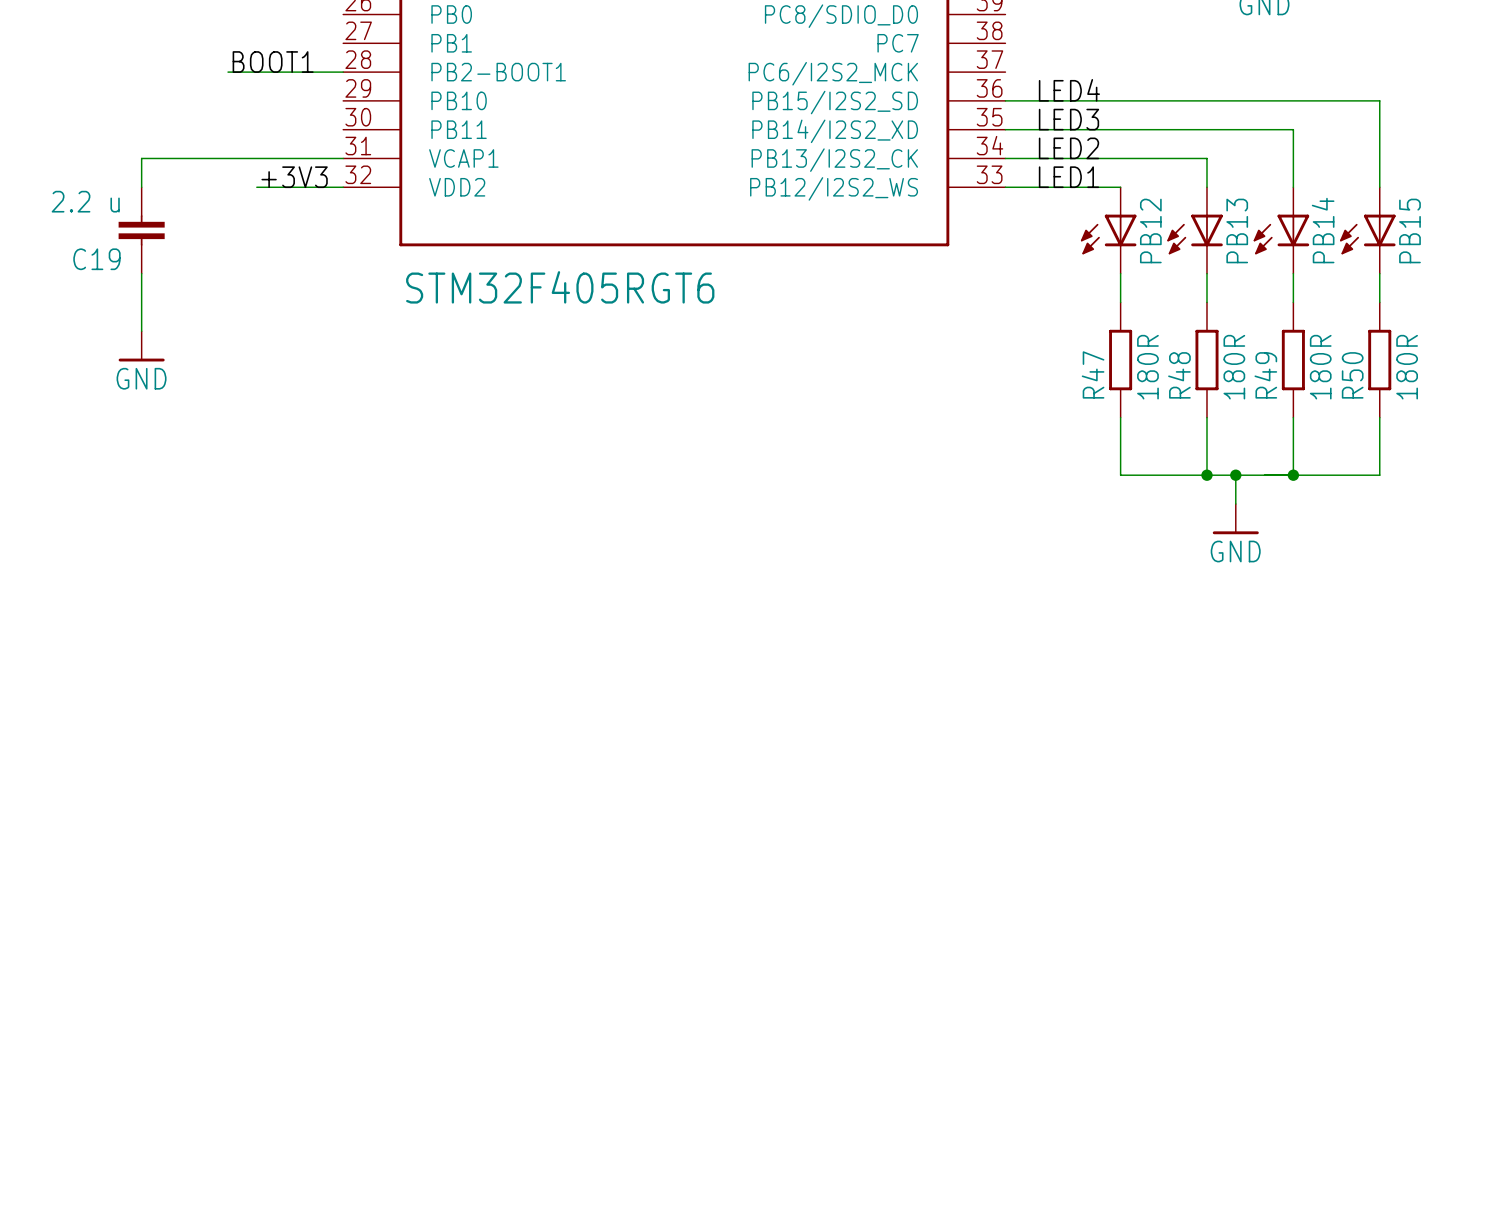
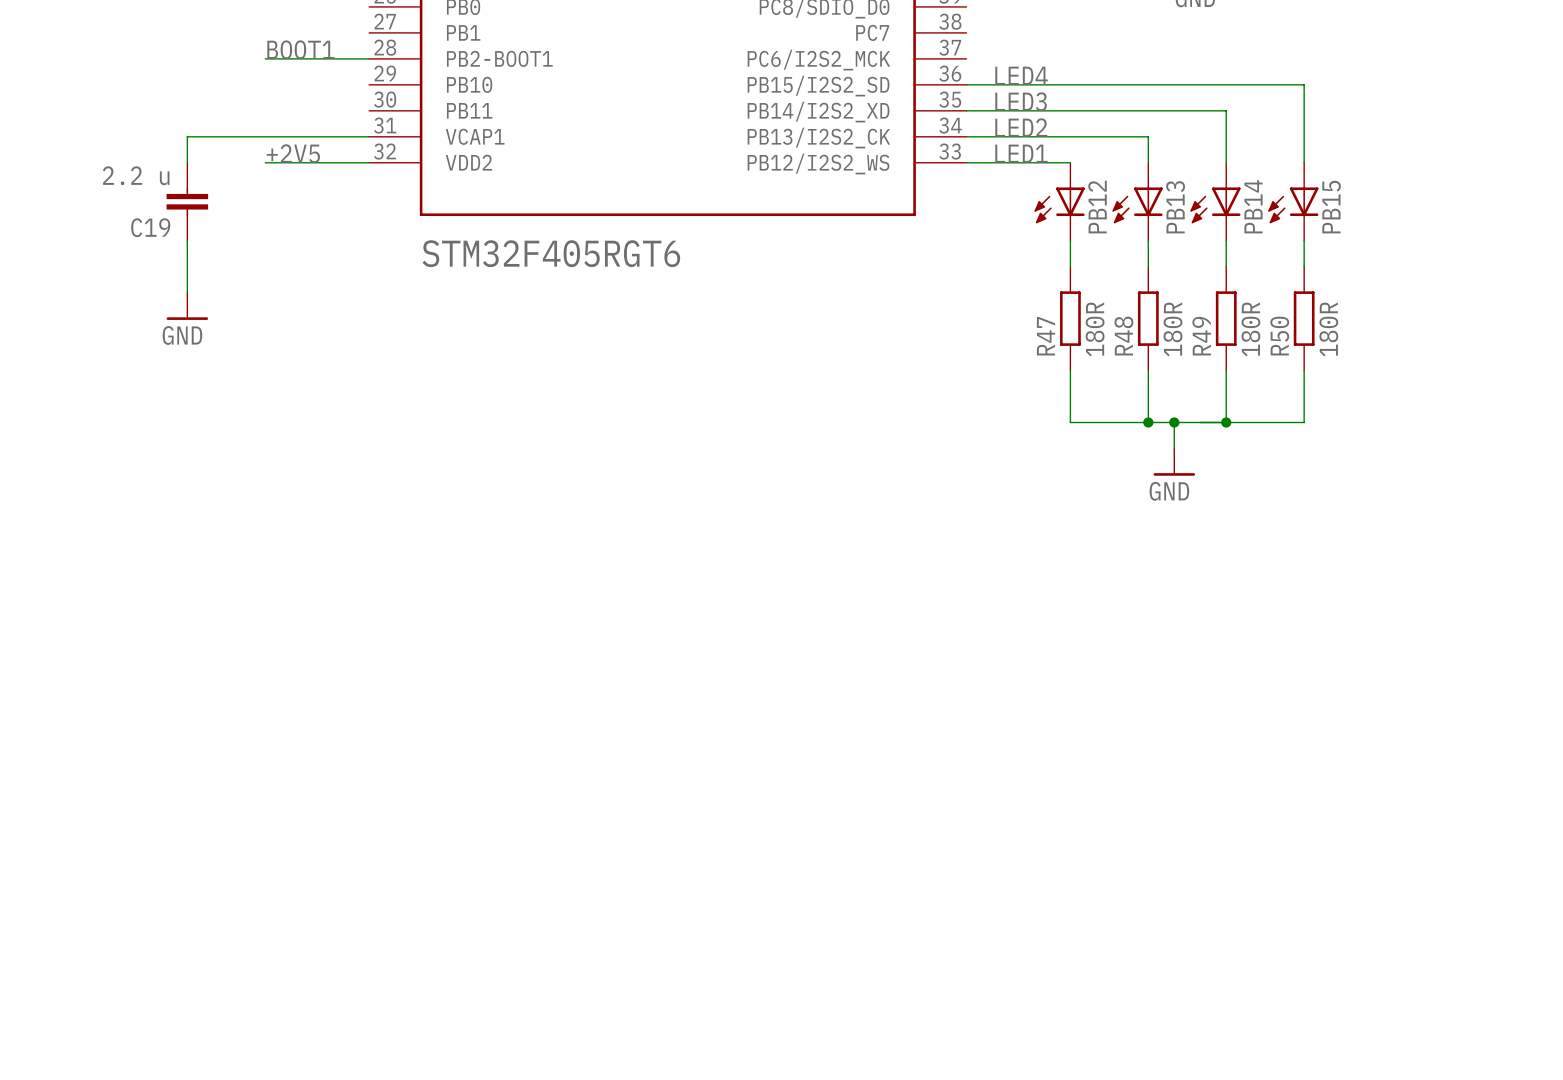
label: none -> +2V5 (293, 153)
label: +3V3 (294, 177) -> none
wire: none -> (265, 162) (291, 162)

